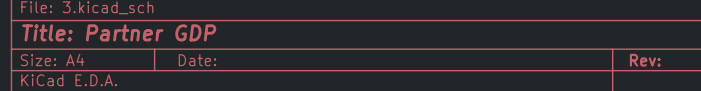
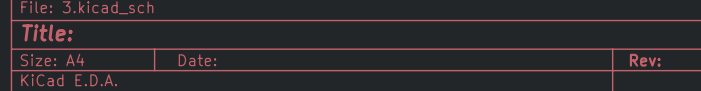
title block: Title: Partner GDP (119, 32) -> Title: (47, 32)

